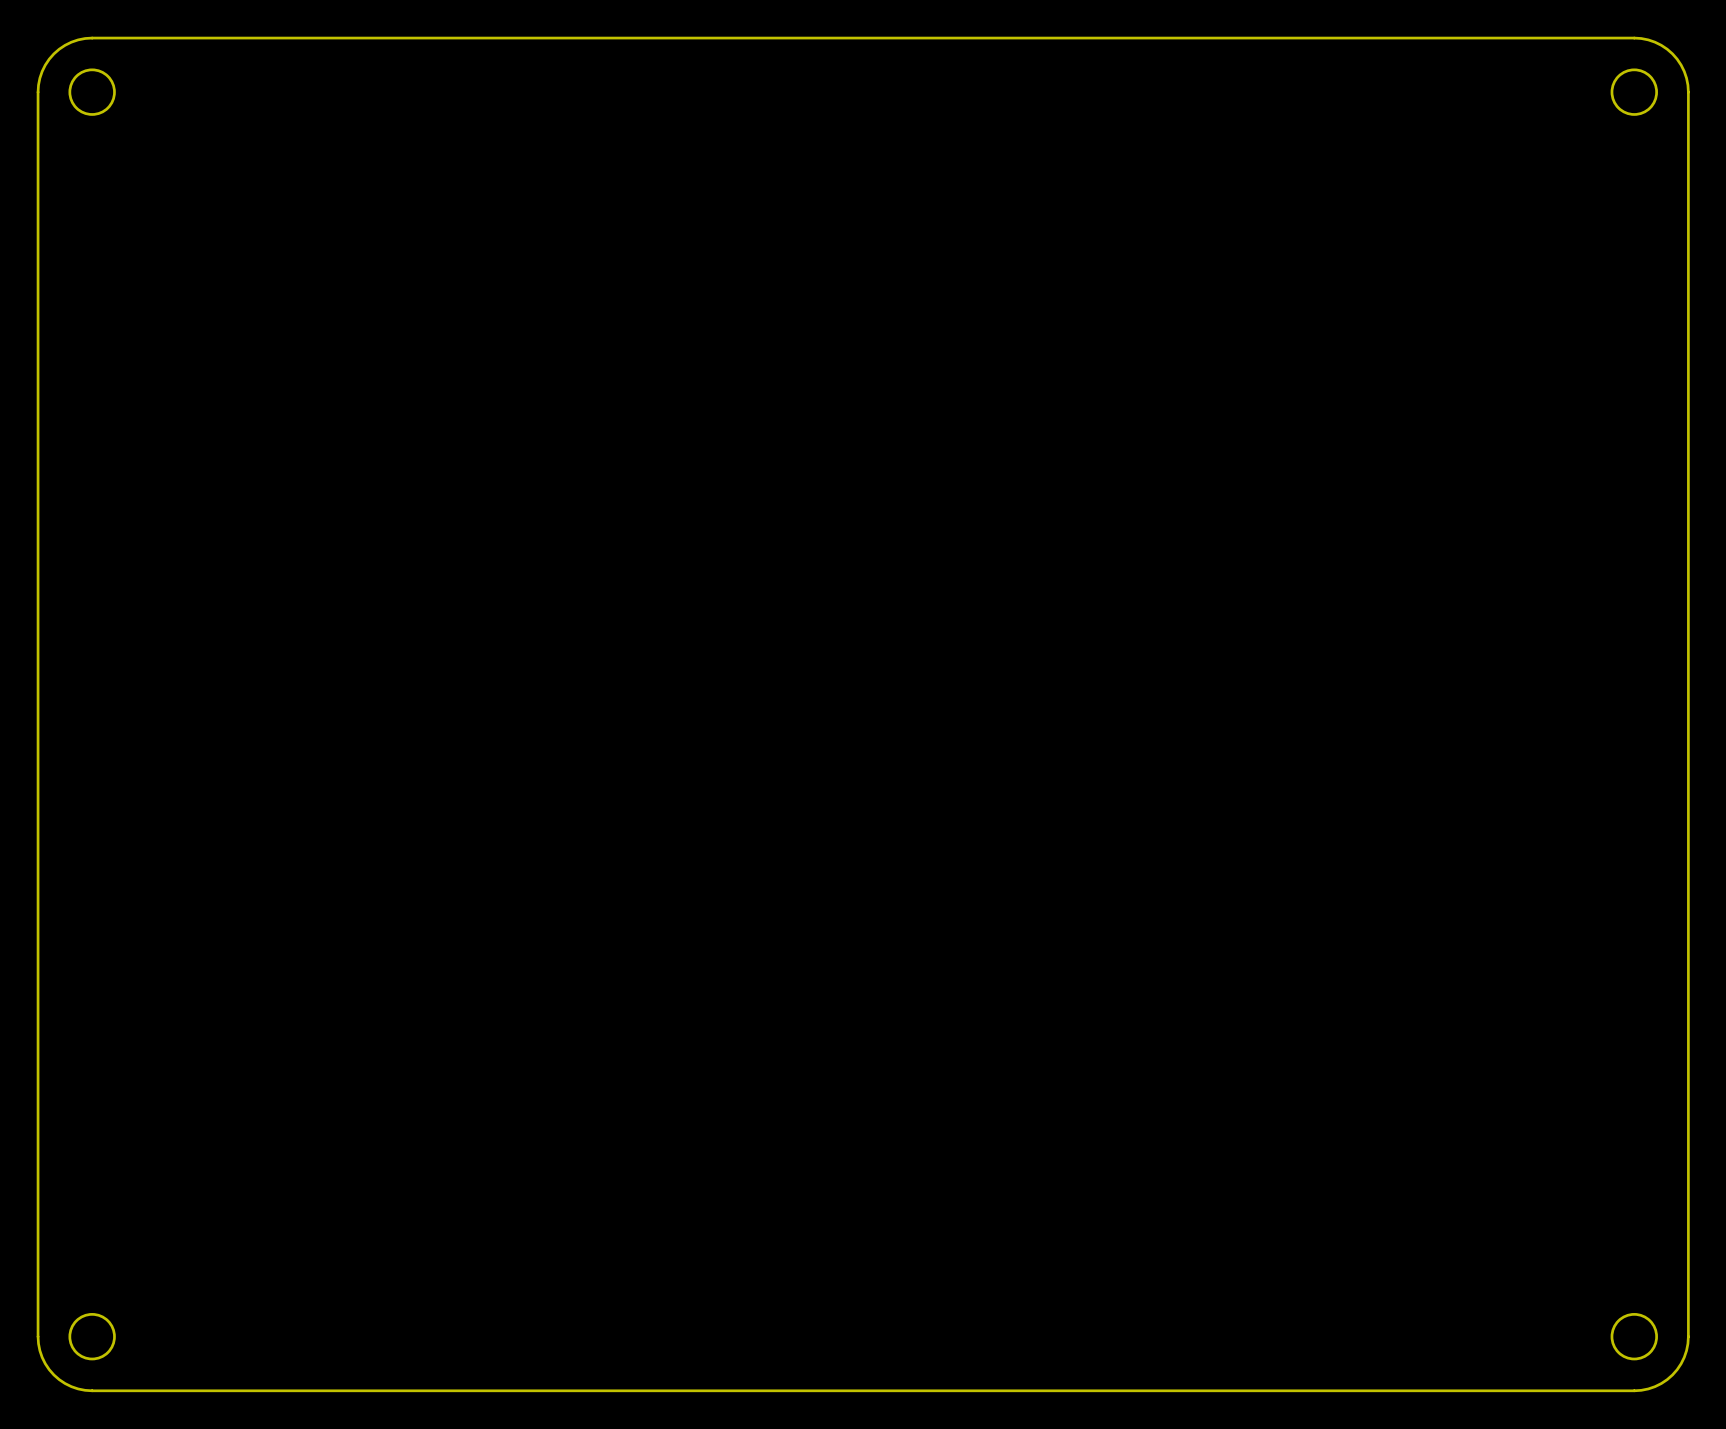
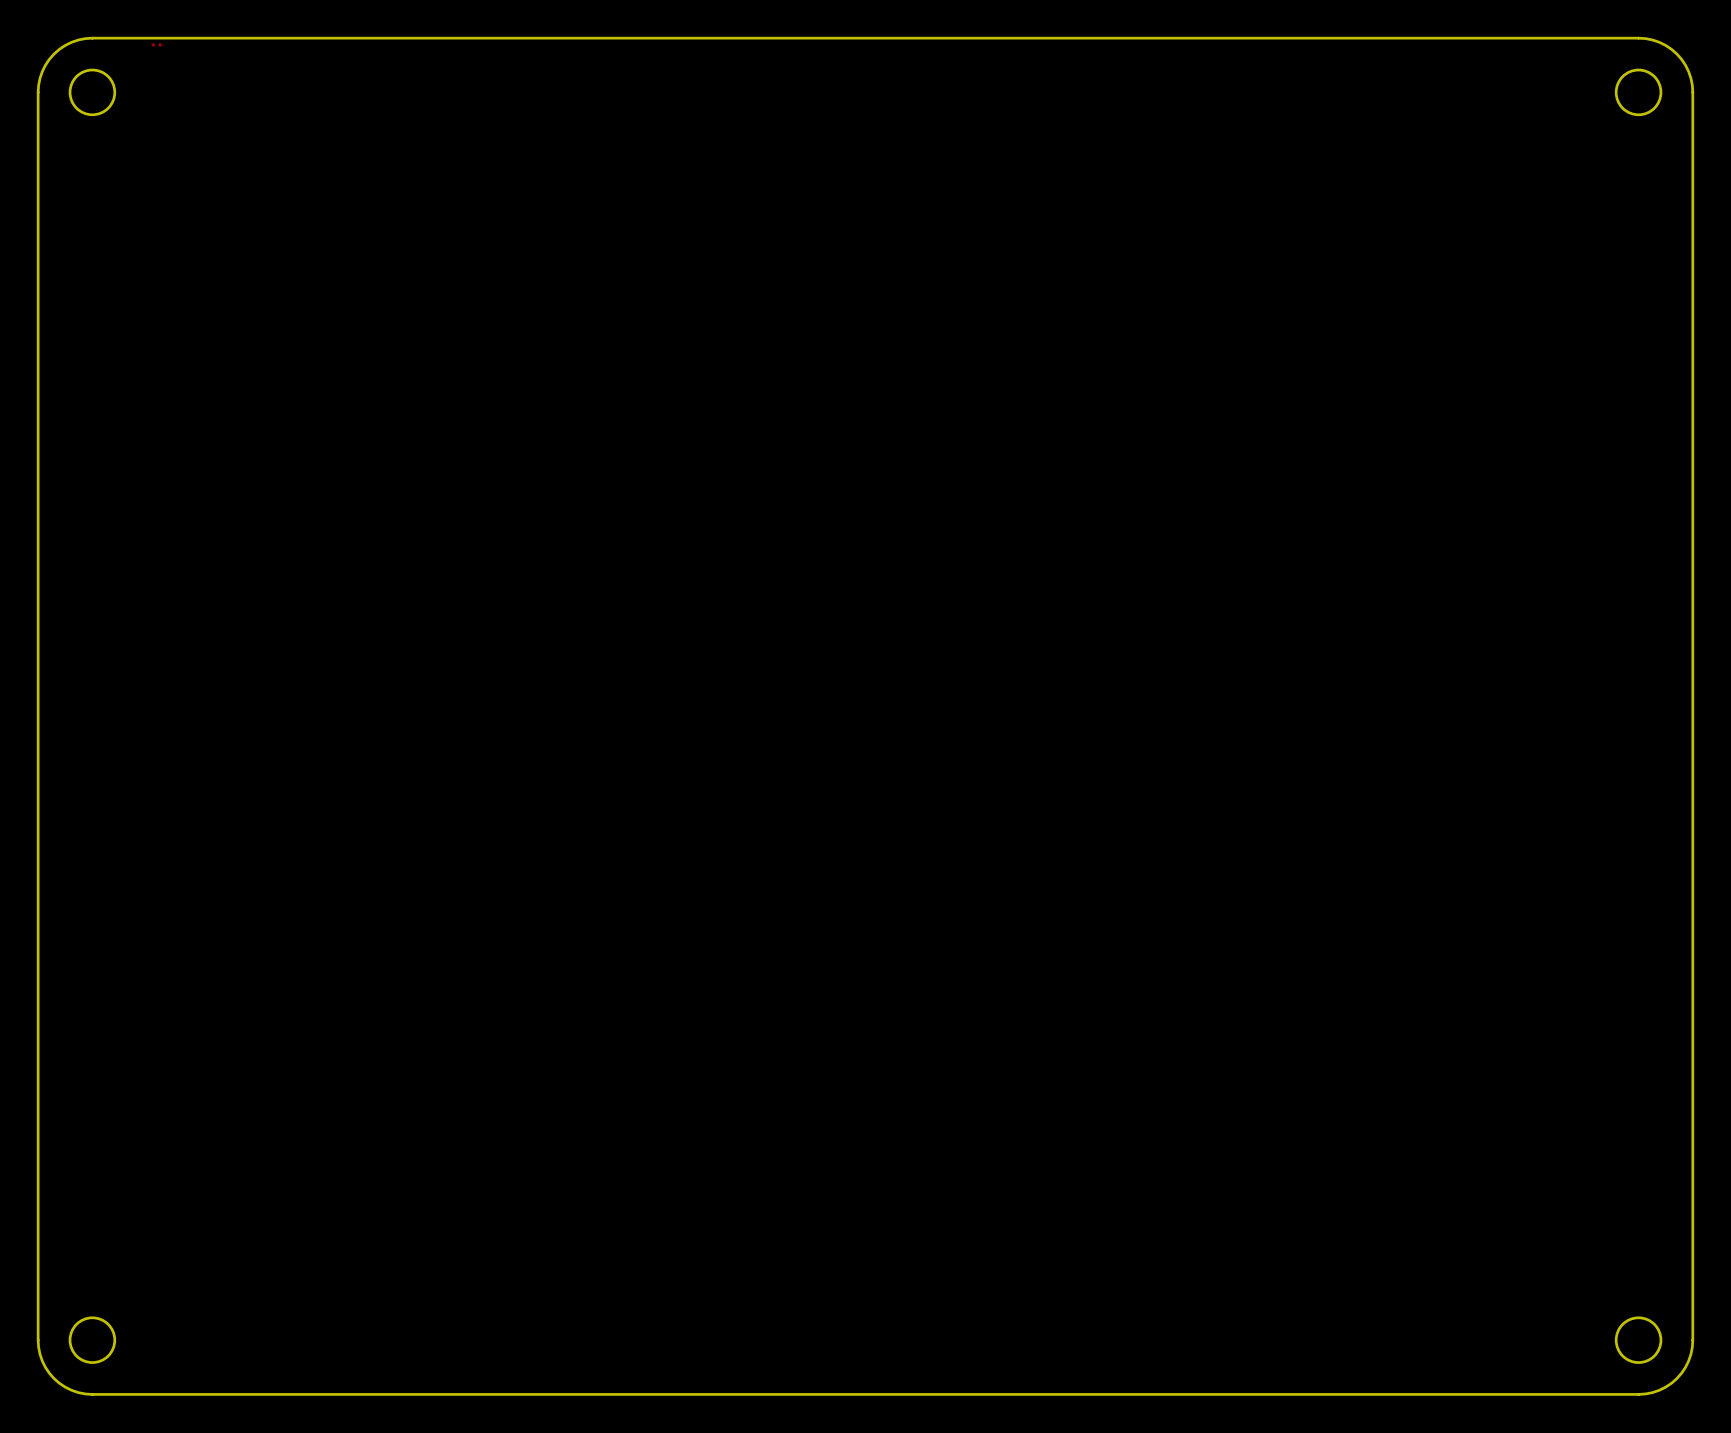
part: none -> (156, 44)

